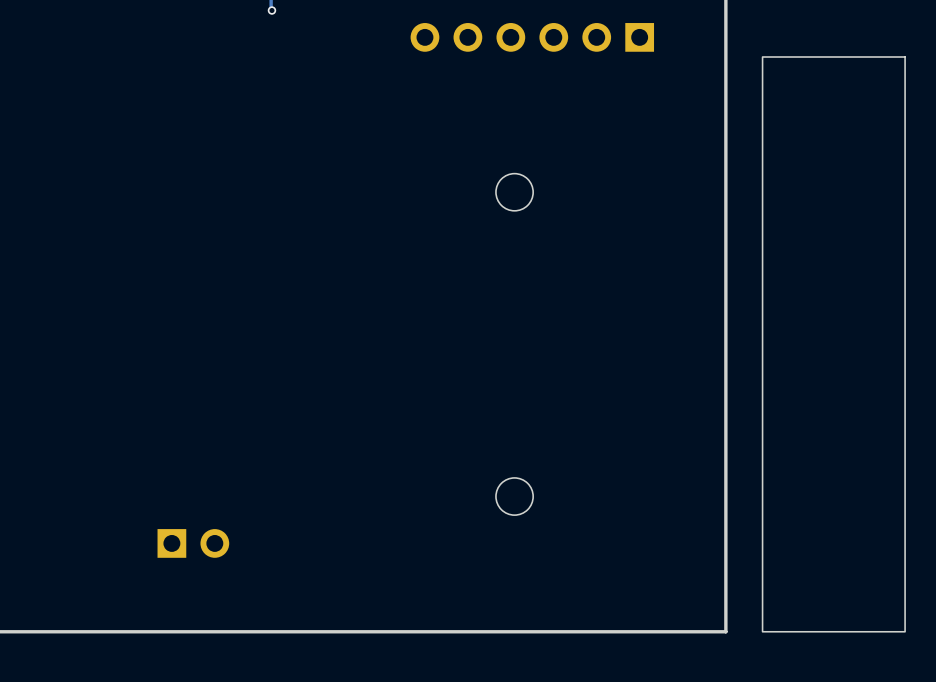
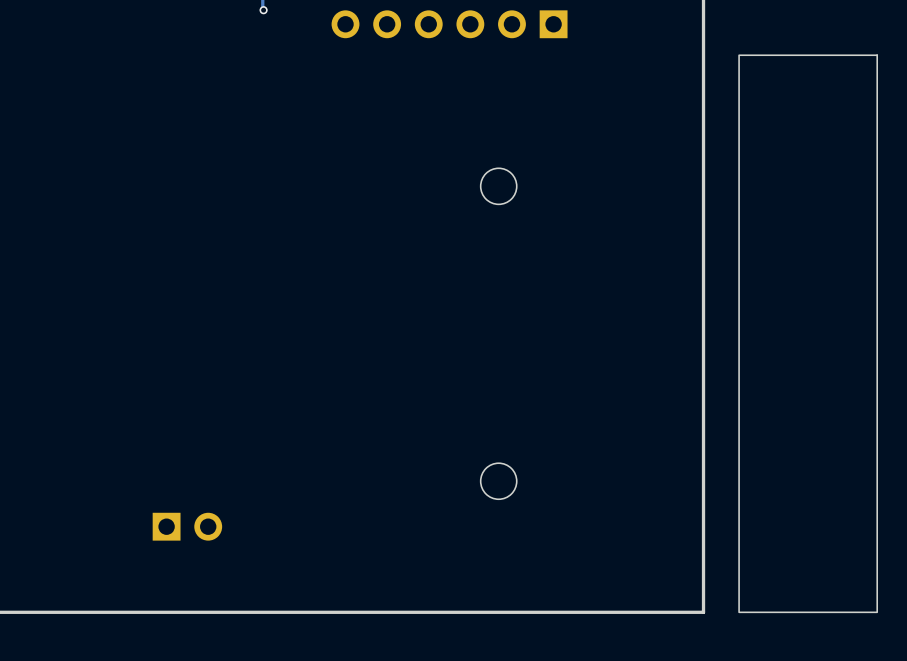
part position: (532, 37) -> (449, 24)

